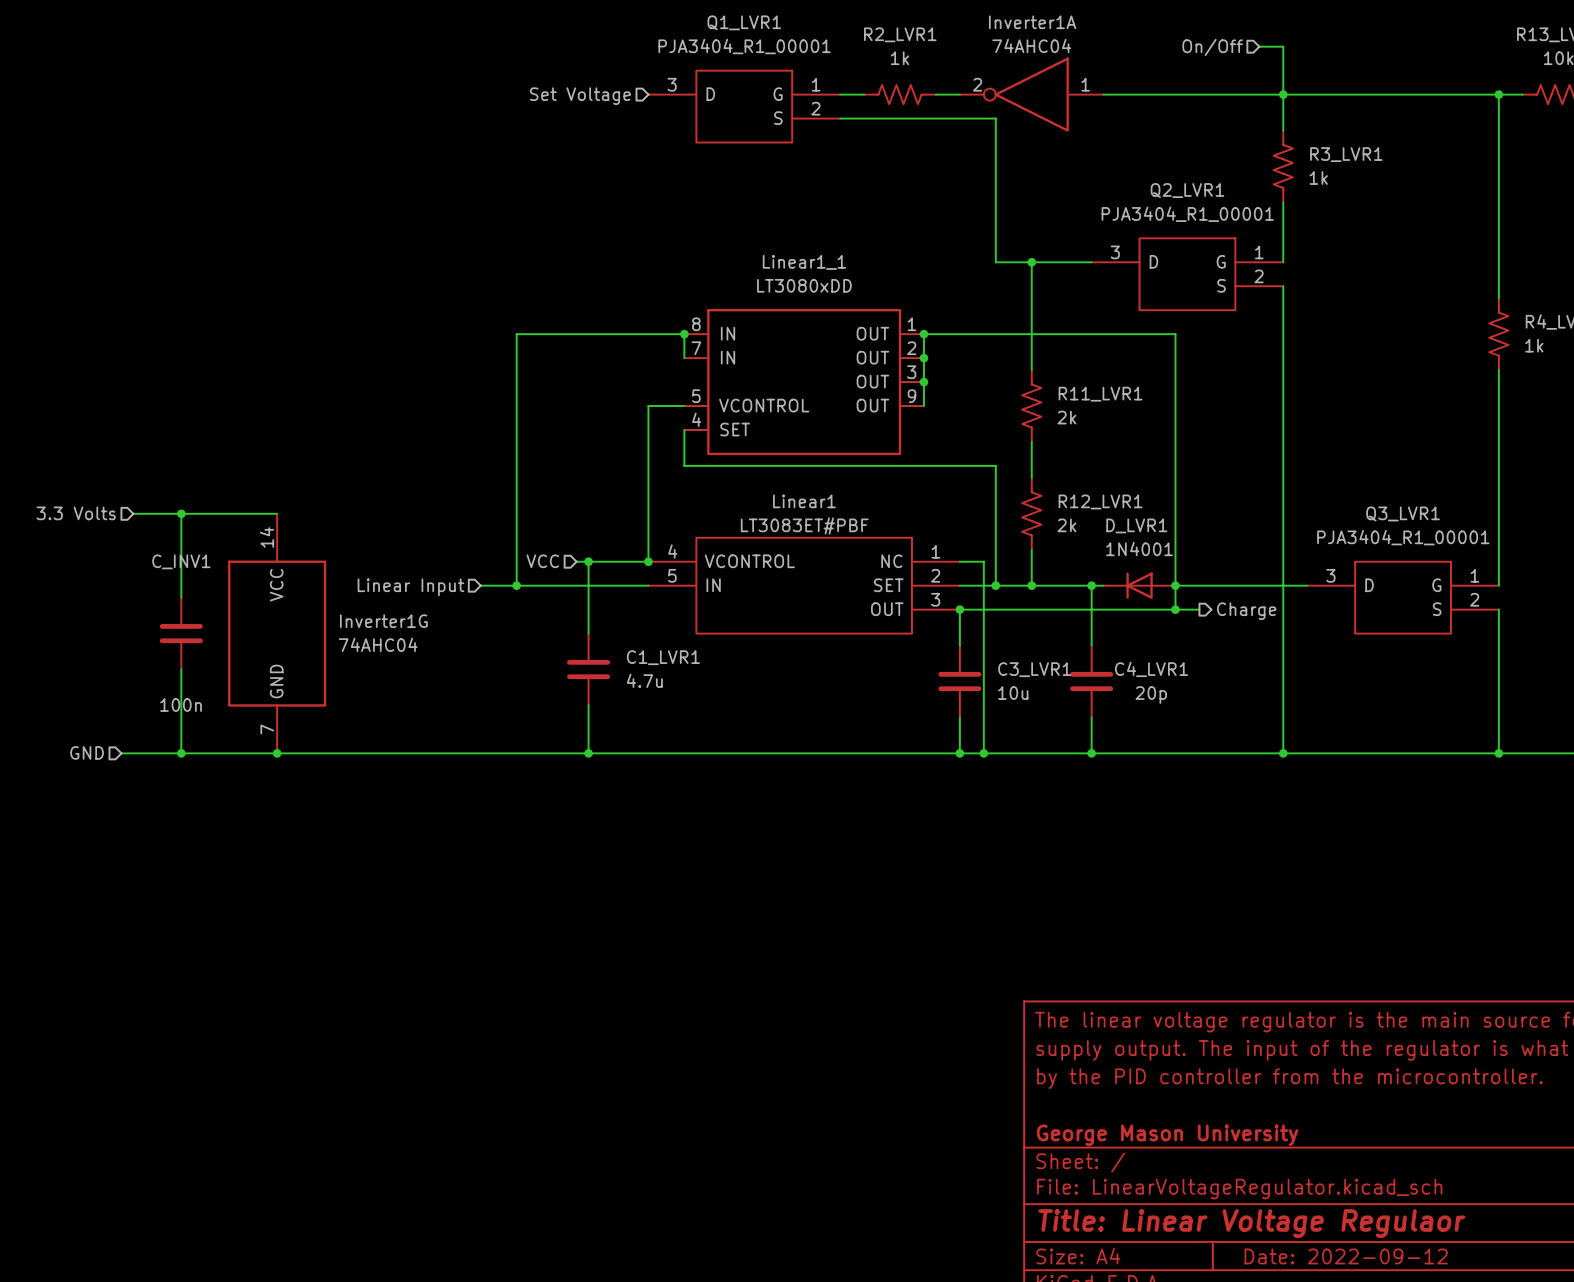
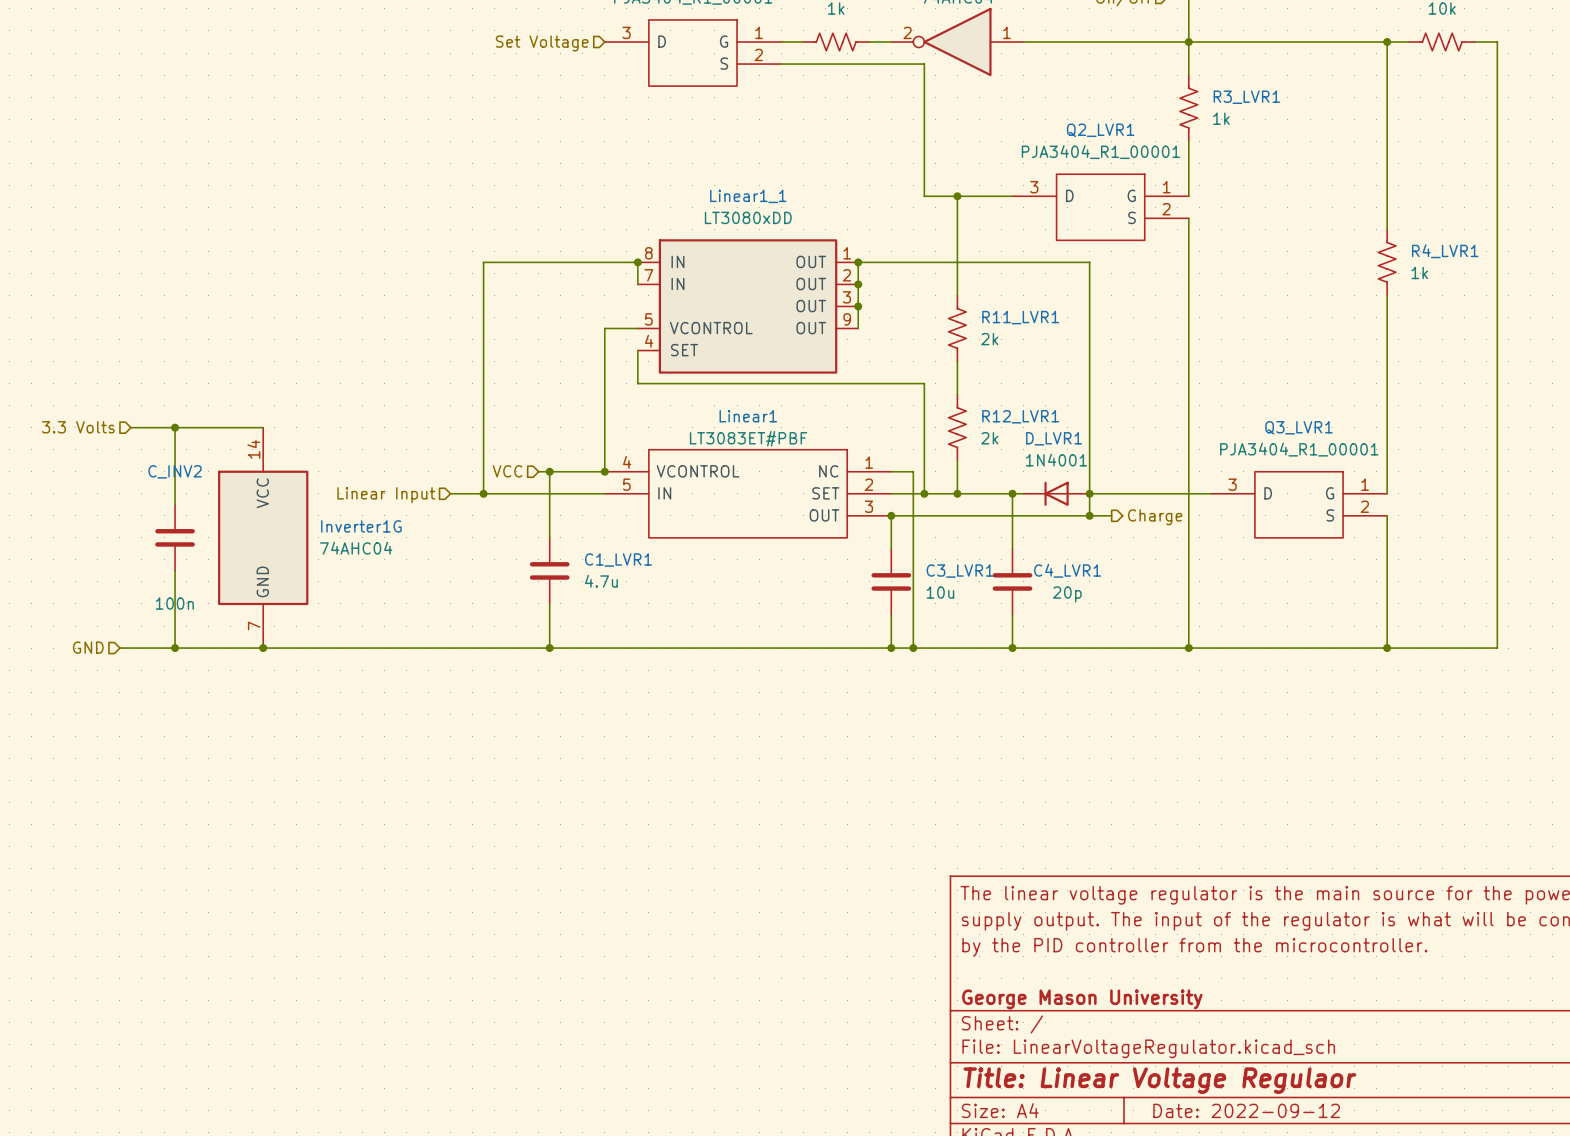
C_INV1 name: C_INV1 (181, 561) -> C_INV2 (175, 471)

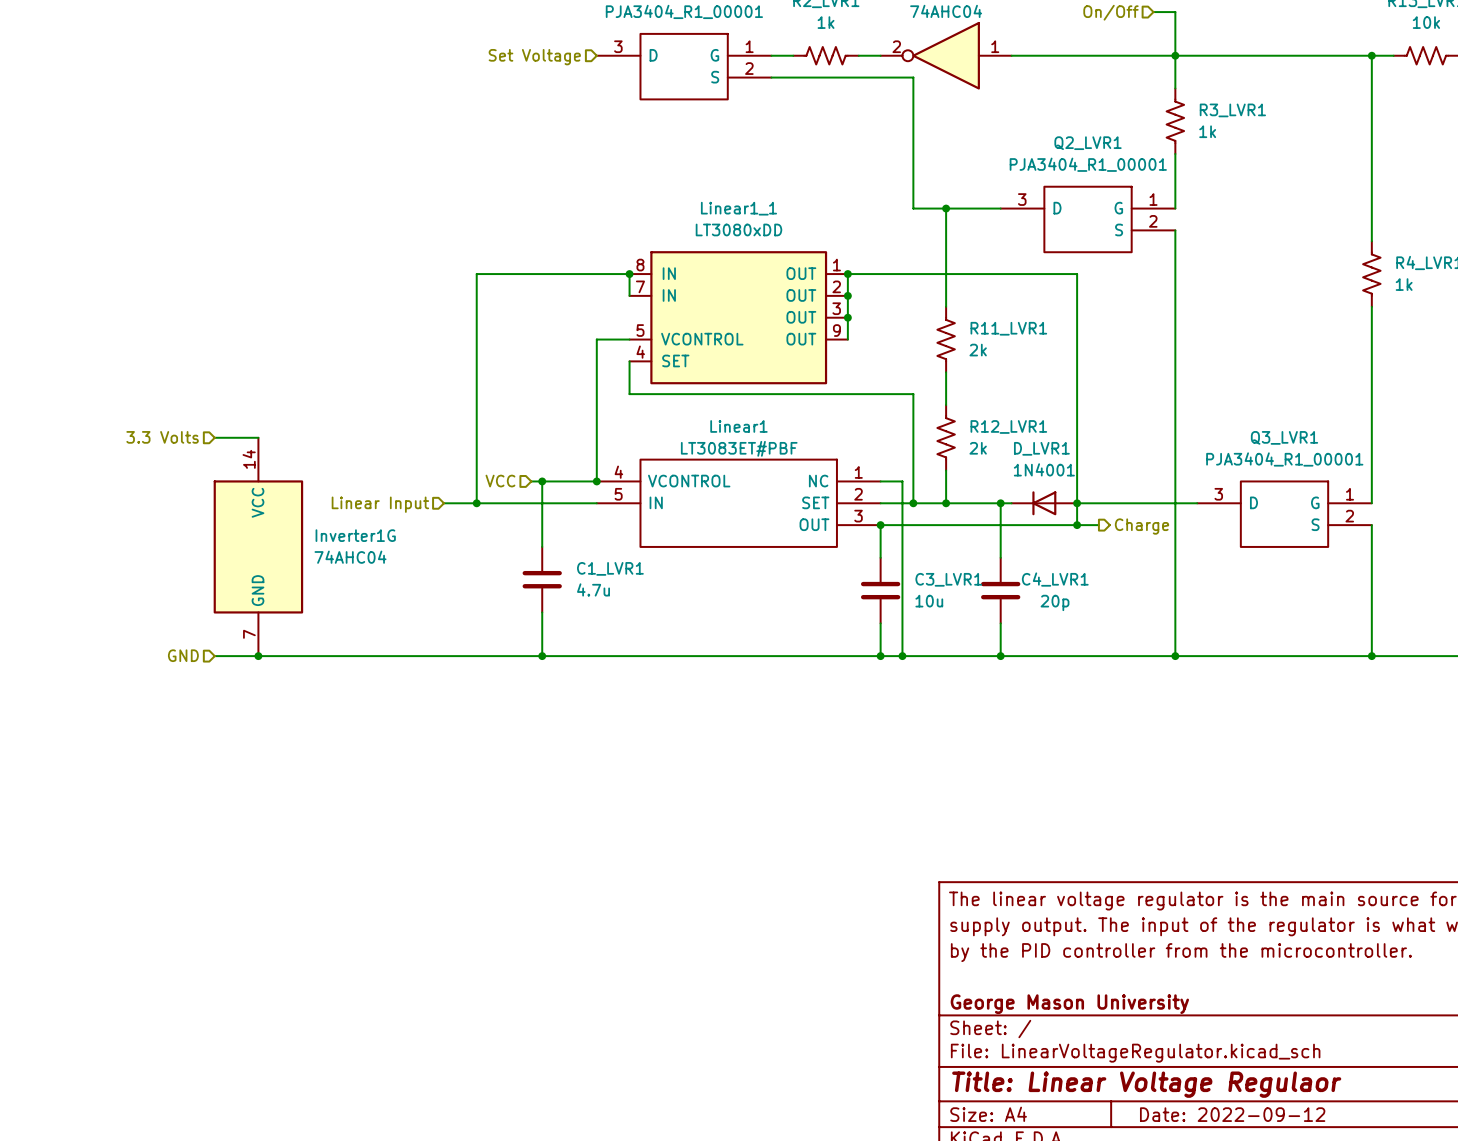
hierarchical label position: 3.3 Volts (78, 427) -> 3.3 Volts (162, 437)
wire: (130, 427) (219, 427) -> none
wire: (175, 427) (175, 504) -> none
junction: (175, 427) -> none
C_INV2: 100n (175, 537) -> none
wire: (175, 570) (175, 648) -> none
hierarchical label position: GND (88, 647) -> GND (183, 655)
wire: (119, 648) (219, 648) -> none
junction: (175, 648) -> none

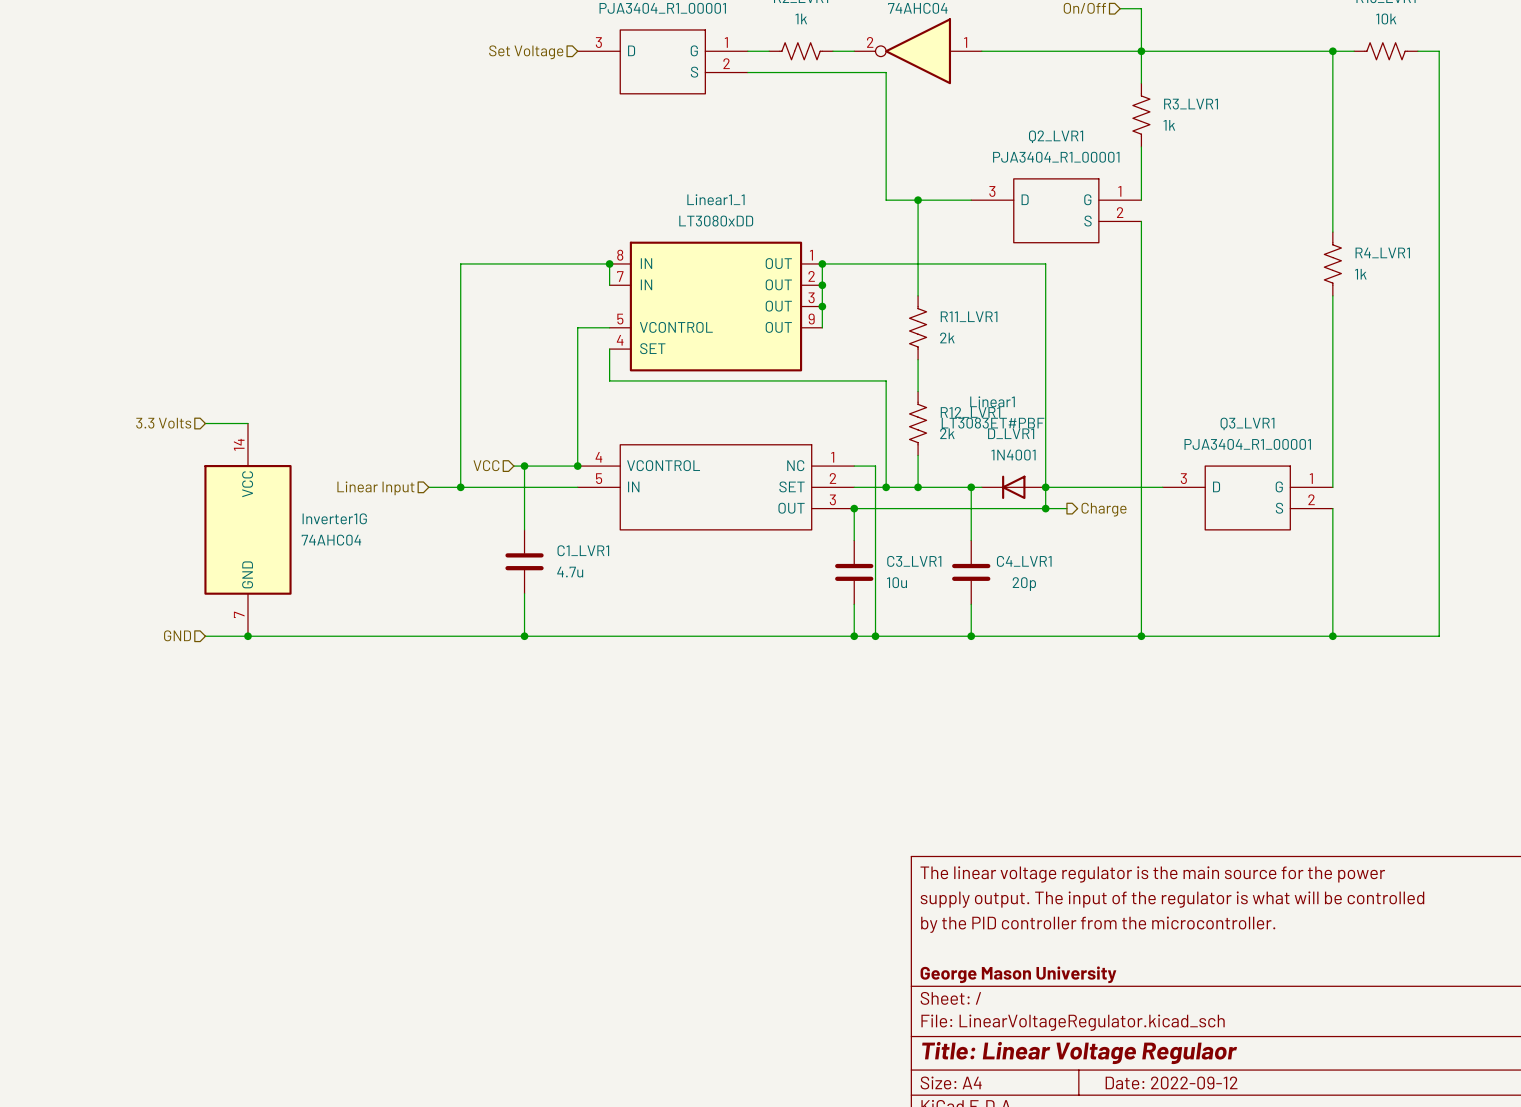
Linear1 name position: Linear1 (738, 426) -> Linear1 (992, 401)
Linear1 value position: LT3083ET#PBF (739, 448) -> LT3083ET#PBF (993, 423)

